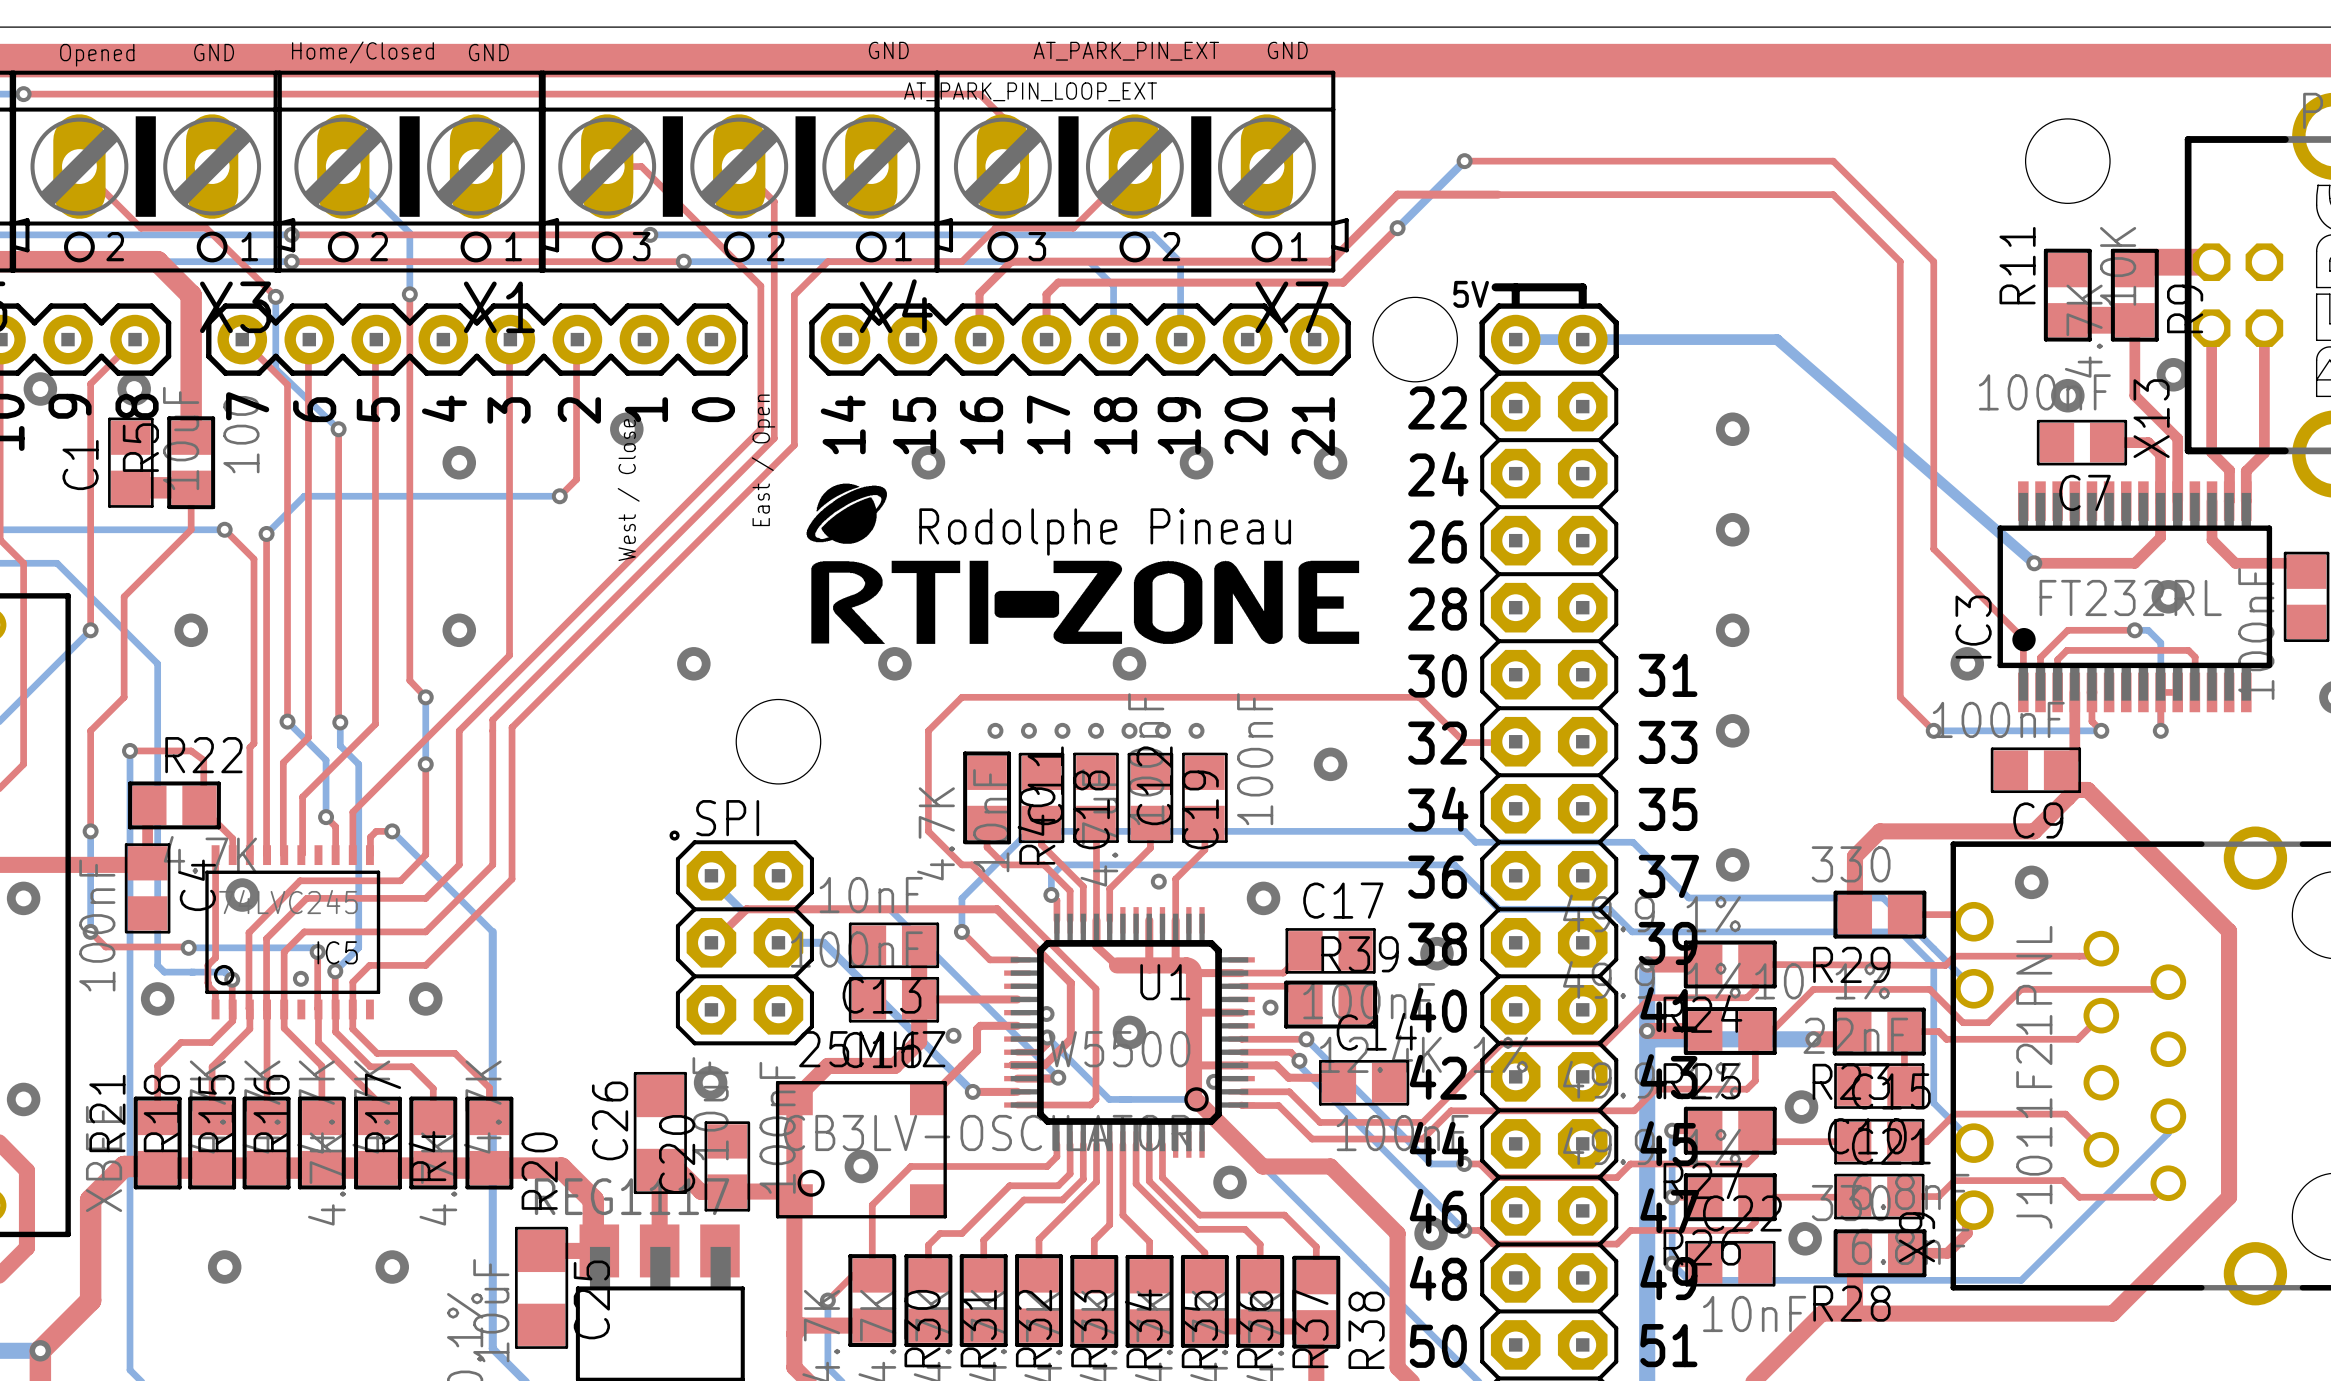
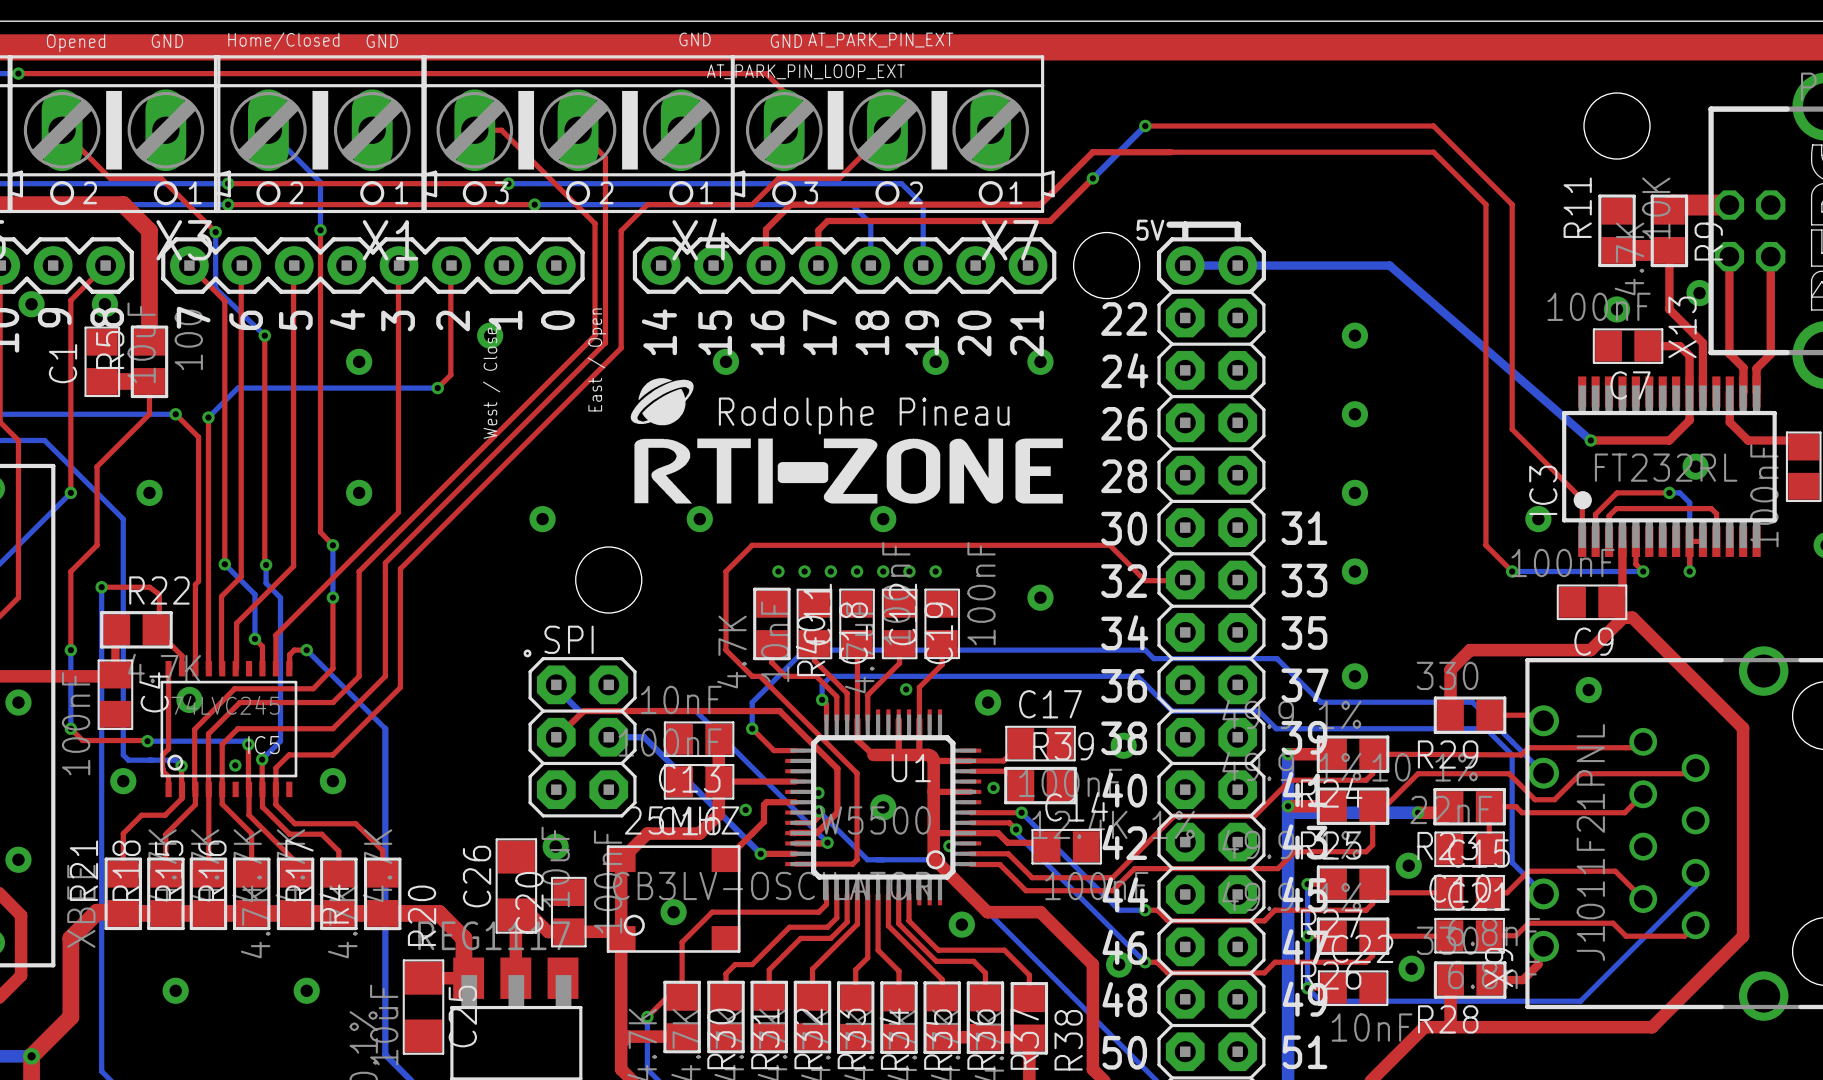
text position: GND (1287, 50) -> GND (786, 41)

